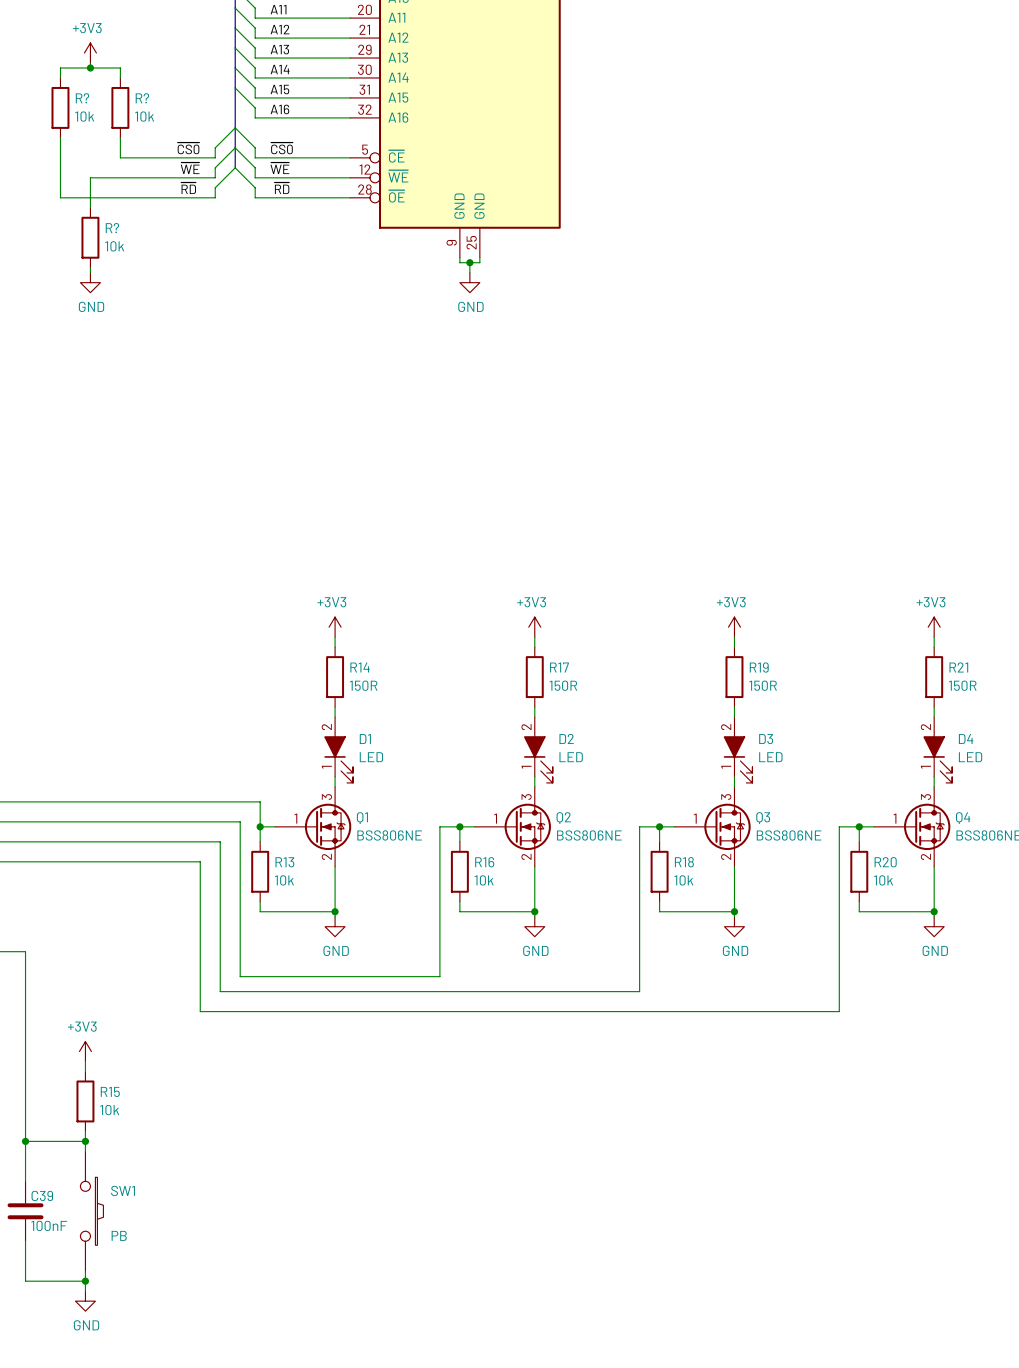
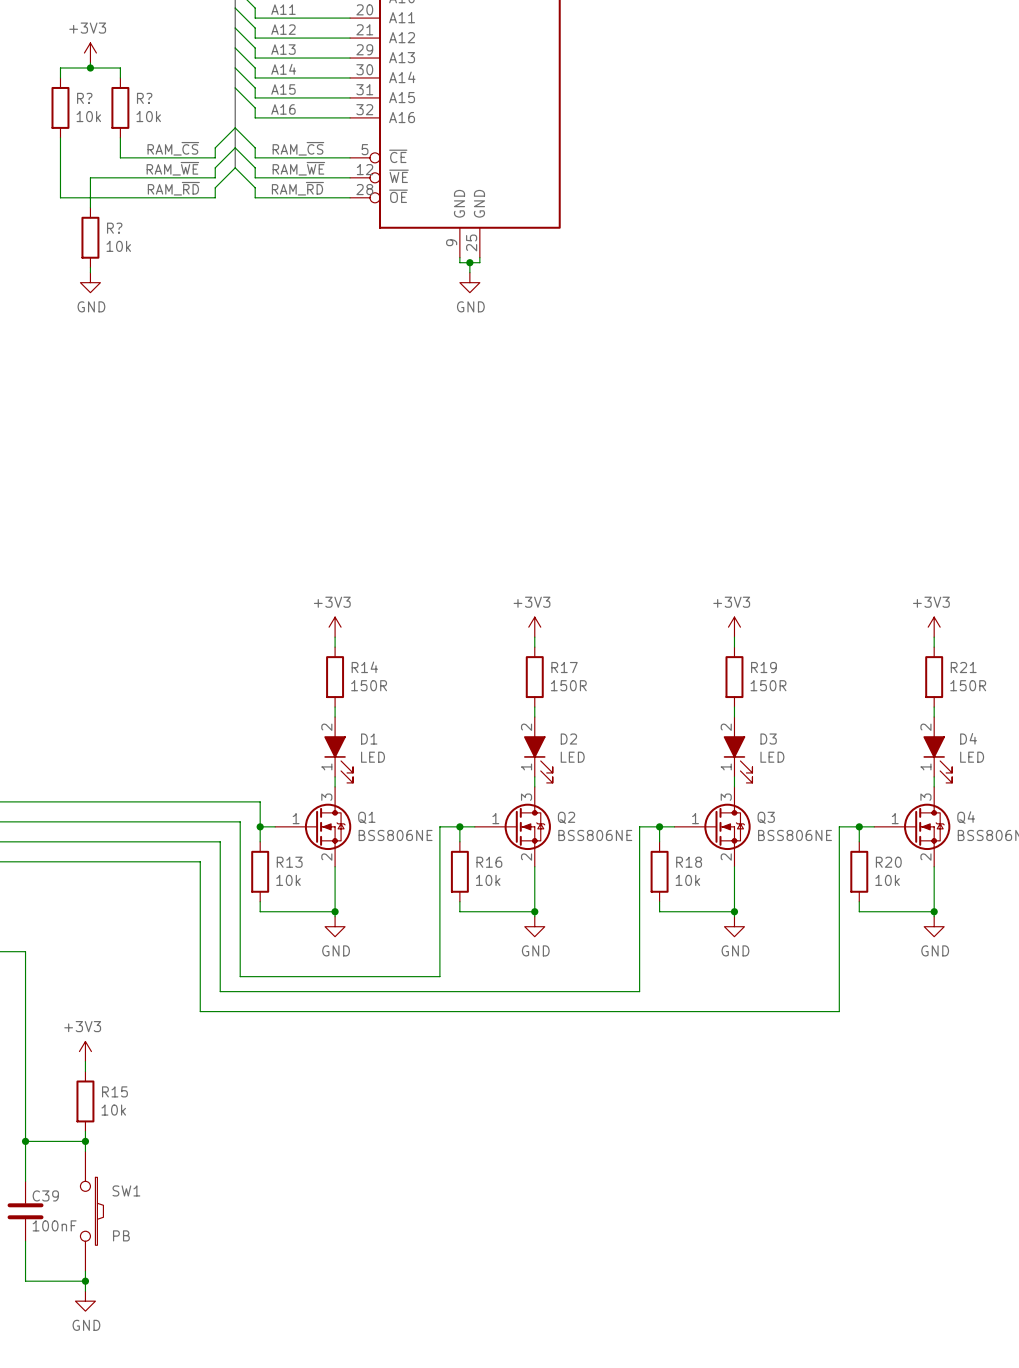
label: ~{CS0} (188, 148) -> RAM_~{CS} (173, 148)
label: ~{CS0} (281, 148) -> RAM_~{CS} (298, 148)
label: ~{WE} (190, 168) -> RAM_~{WE} (172, 168)
label: ~{WE} (279, 168) -> RAM_~{WE} (298, 168)
label: ~{RD} (188, 188) -> RAM_~{RD} (173, 188)
label: ~{RD} (281, 188) -> RAM_~{RD} (297, 188)

